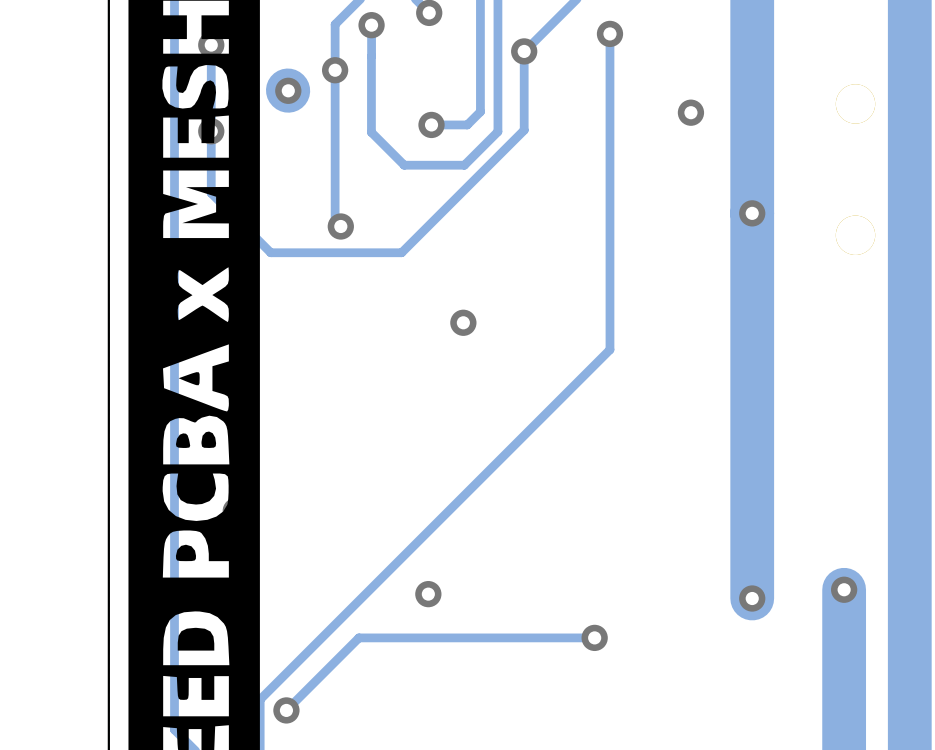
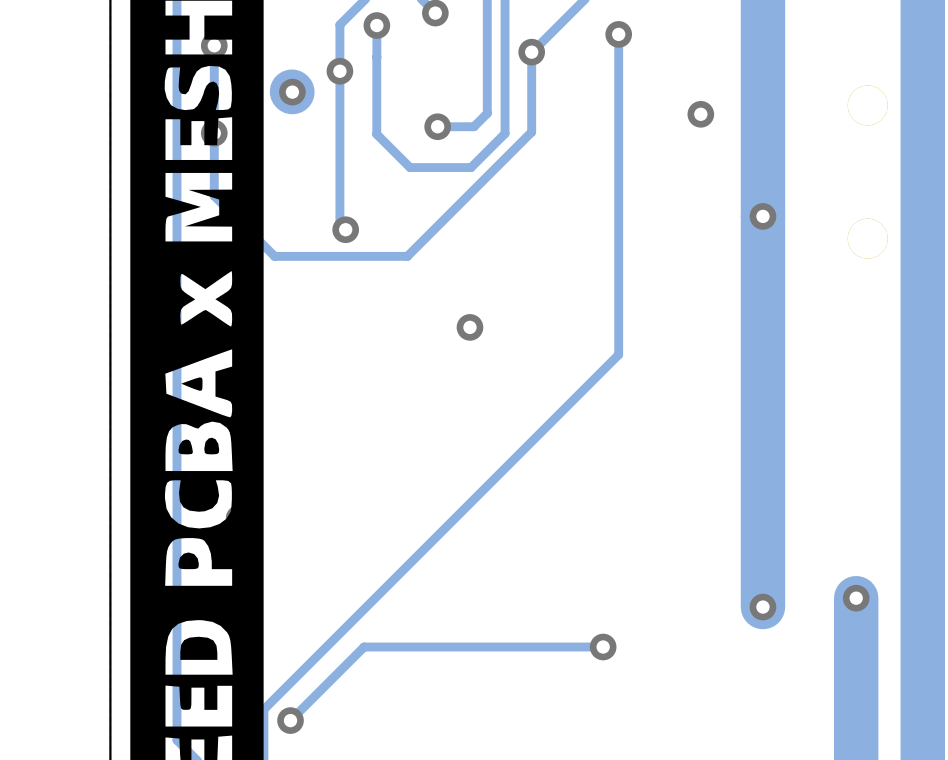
via: (428, 594) -> none

